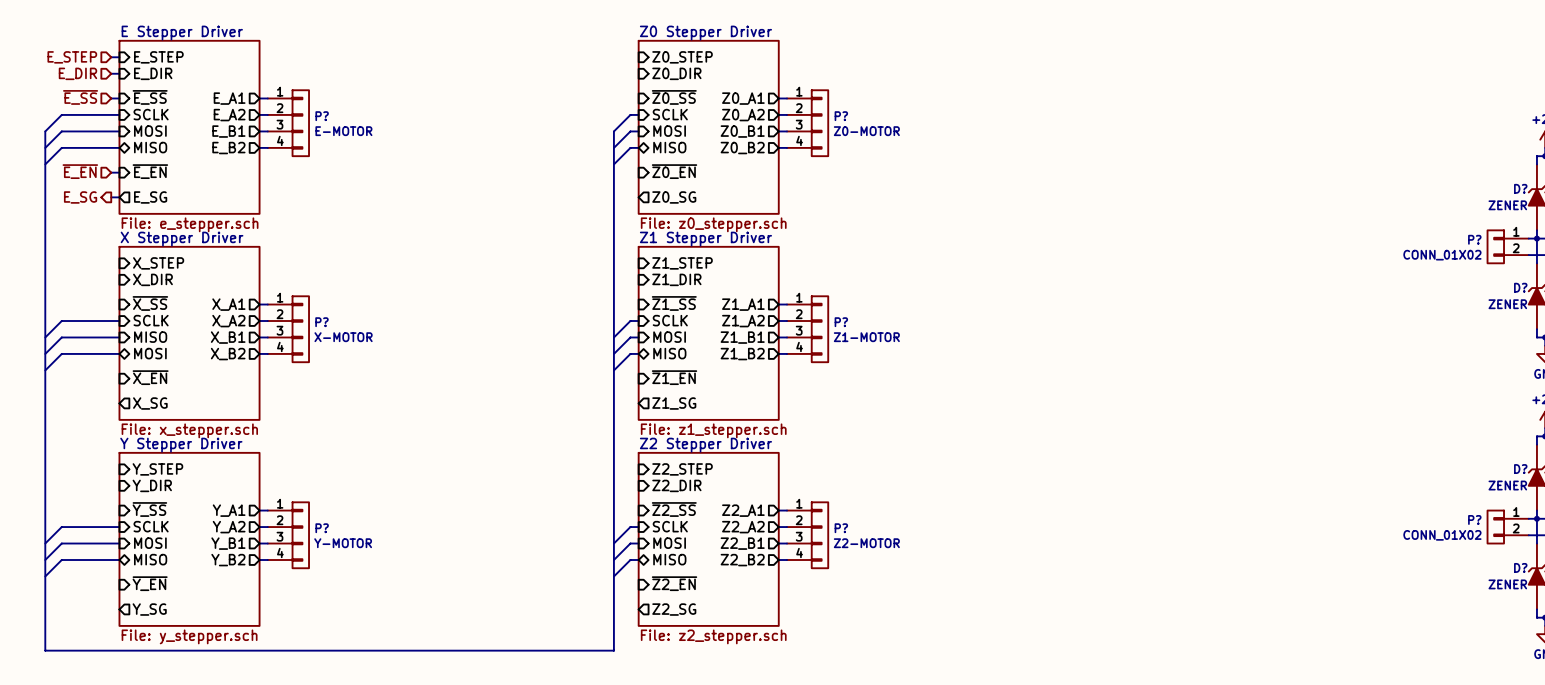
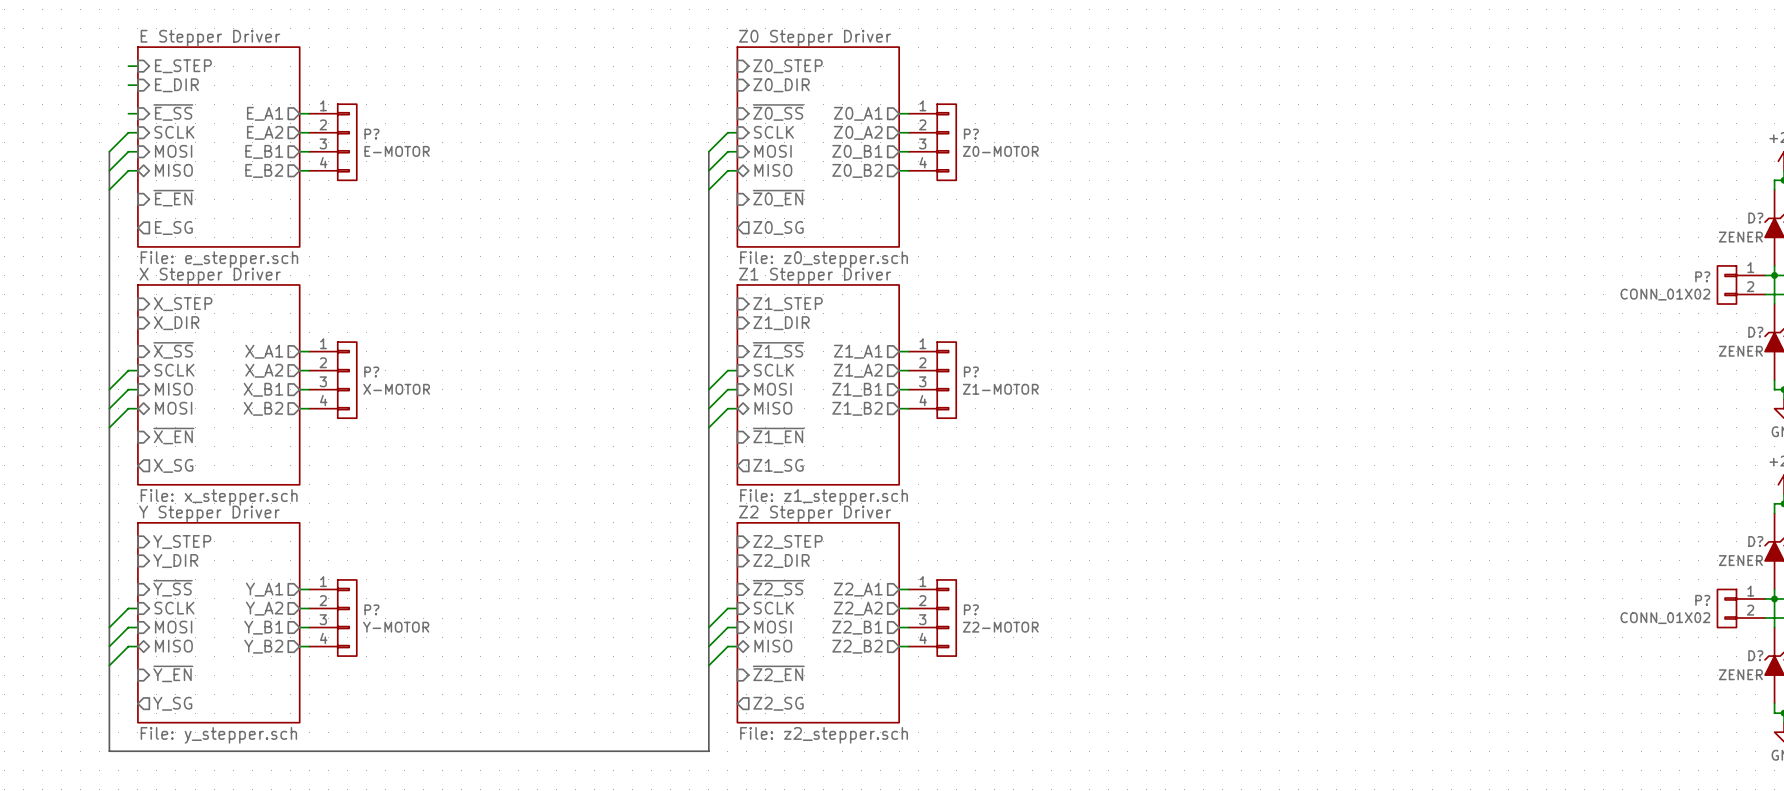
hierarchical label: E_STEP (72, 57) -> none
hierarchical label: E_DIR (77, 73) -> none
hierarchical label: ~{E_SS} (80, 97) -> none
wire: (111, 114) (61, 114) (45, 131) -> (128, 132) (109, 151)
bus: (45, 131) (45, 650) (94, 650) -> (109, 151) (109, 751)
wire: (111, 131) (61, 131) (45, 147) -> (128, 151) (109, 170)
wire: (111, 147) (61, 147) (45, 164) -> (128, 170) (109, 189)
hierarchical label: ~{E_EN} (80, 171) -> none
wire: (111, 172) (119, 172) -> none
hierarchical label: E_SG (80, 197) -> none
wire: (111, 197) (119, 197) -> none
wire: (111, 321) (61, 321) (45, 337) -> (128, 370) (109, 389)
wire: (111, 337) (61, 337) (45, 353) -> (128, 389) (109, 408)
wire: (111, 353) (61, 353) (45, 370) -> (128, 408) (109, 427)
wire: (111, 527) (61, 527) (45, 543) -> (128, 608) (109, 627)
wire: (111, 543) (61, 543) (45, 560) -> (128, 627) (109, 646)
wire: (111, 560) (61, 560) (45, 576) -> (128, 646) (109, 665)

